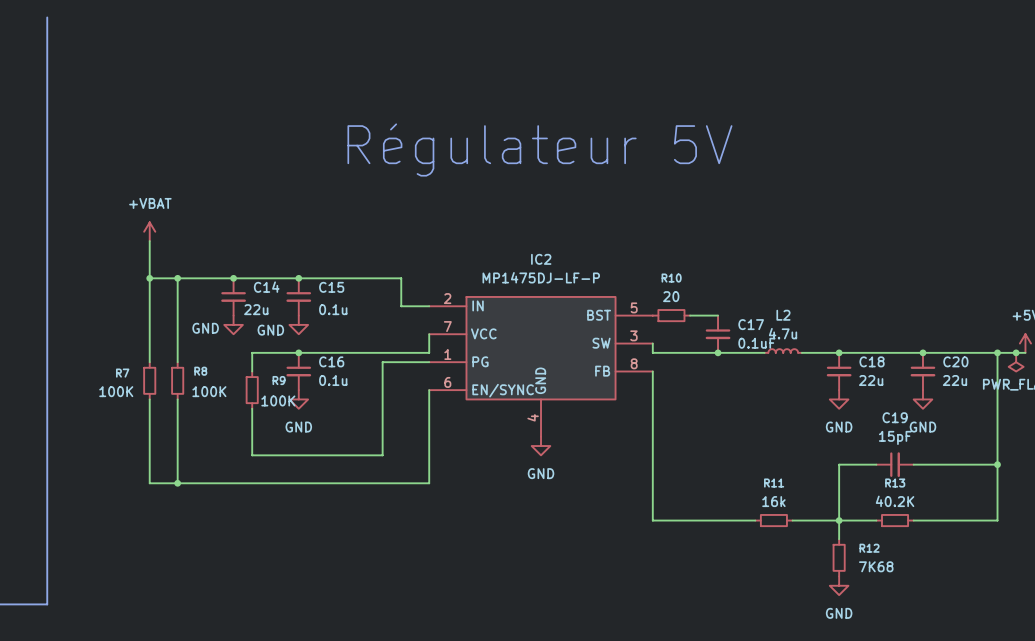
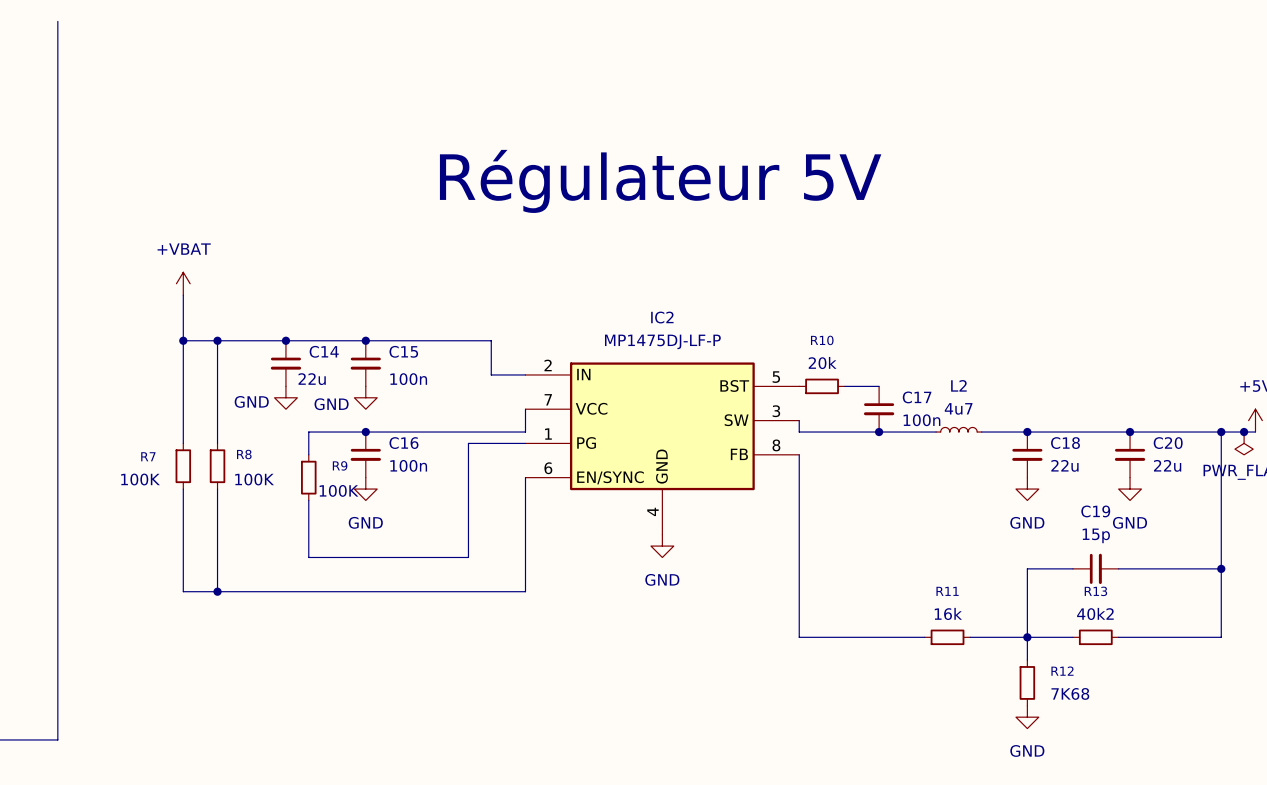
R10 value: 20 (671, 296) -> 20k (822, 363)
C15 value: 0.1u (333, 309) -> 100n (408, 379)
L2 value: 4.7u (783, 333) -> 4u7 (958, 408)
C17 value: 0.1uF (756, 343) -> 100n (921, 420)
C16 value: 0.1u (333, 380) -> 100n (408, 465)
C19 value: 15pF (895, 437) -> 15p (1096, 535)
R13 value: 40.2K (895, 501) -> 40k2 (1095, 613)

